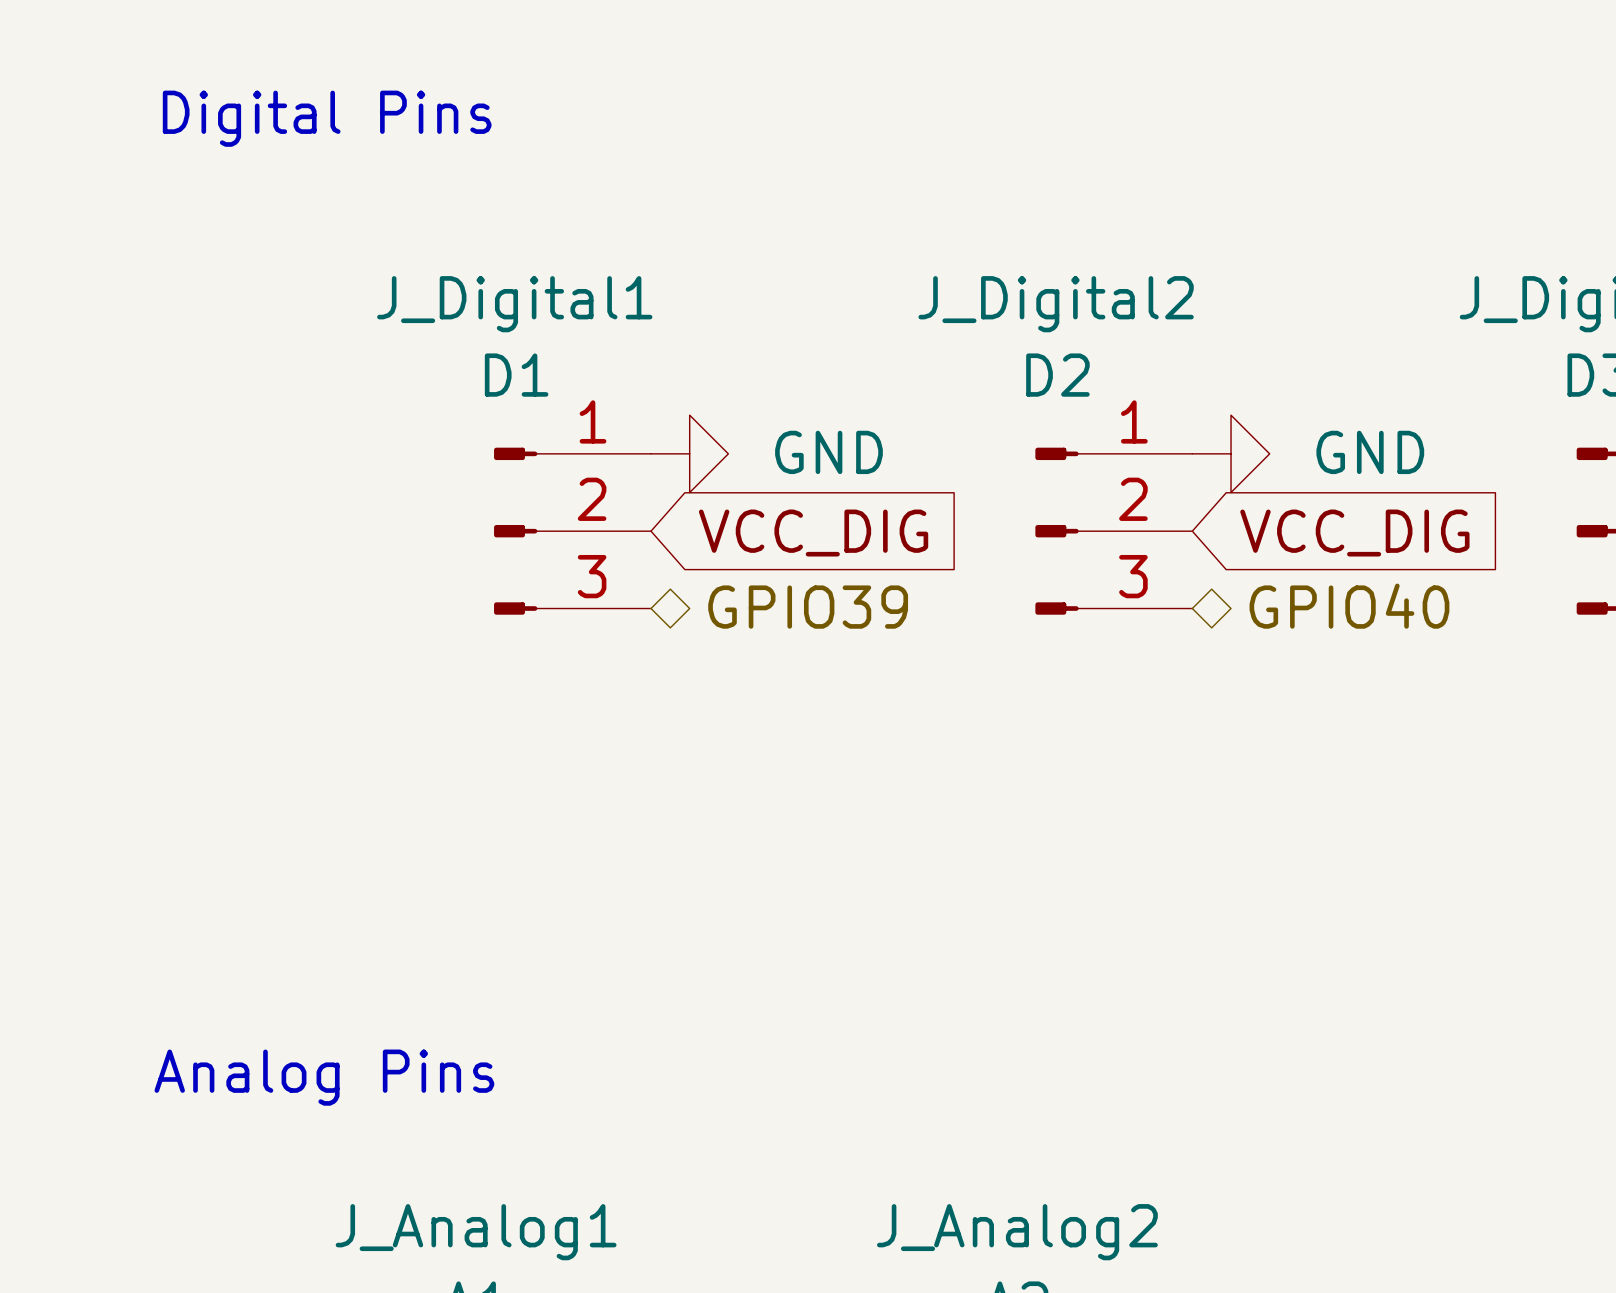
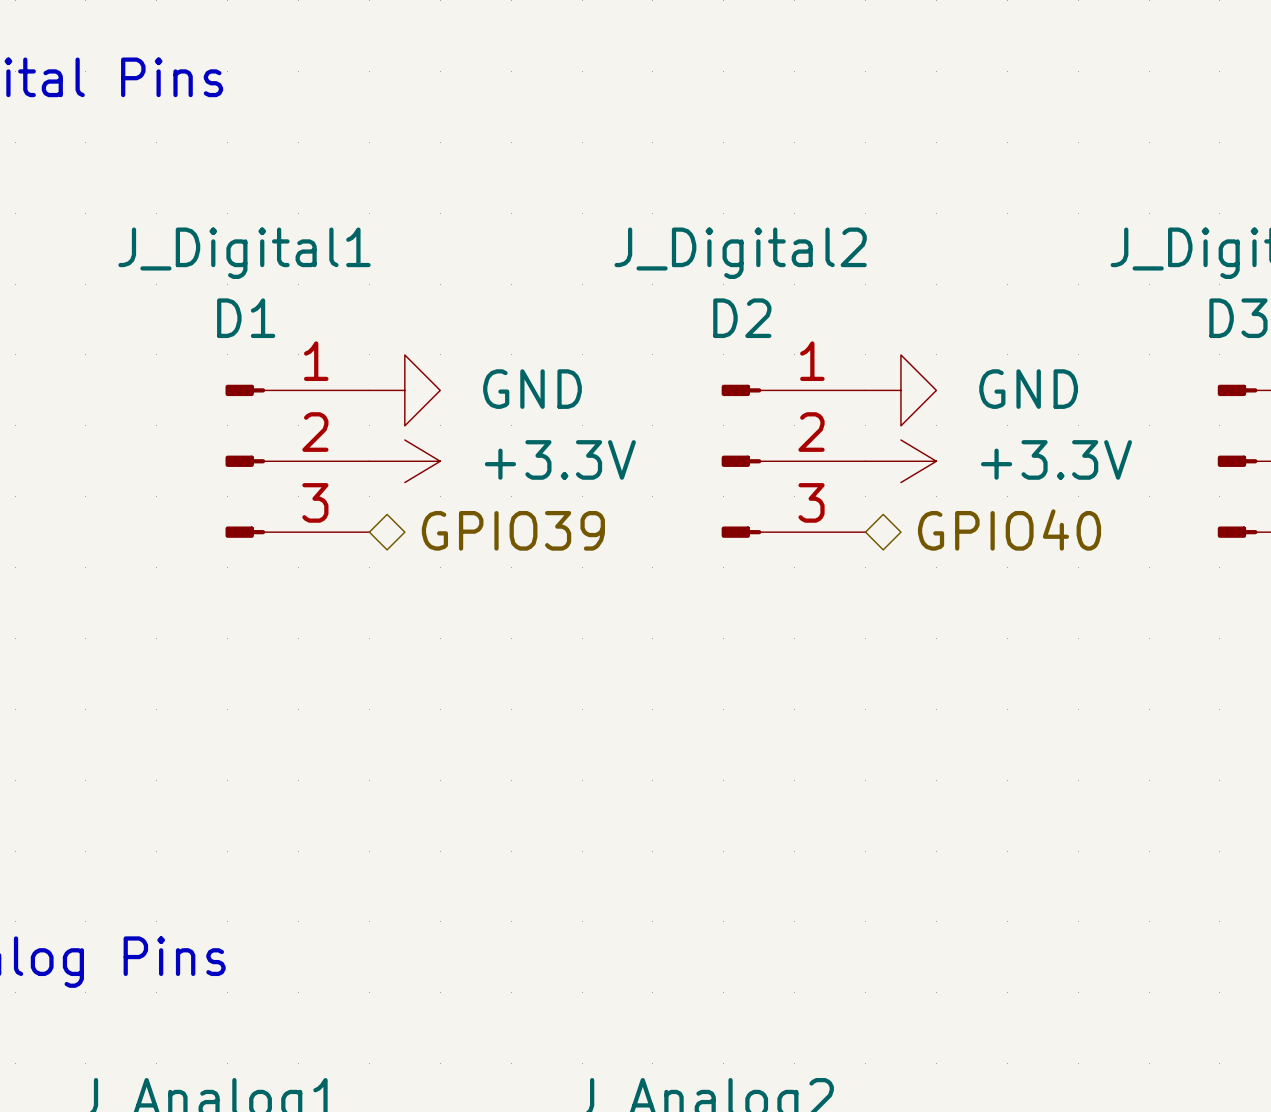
power symbol: none -> +3.3V (404, 461)
power symbol: none -> +3.3V (900, 461)
global label: VCC_DIG (813, 533) -> none
global label: VCC_DIG (1354, 533) -> none

